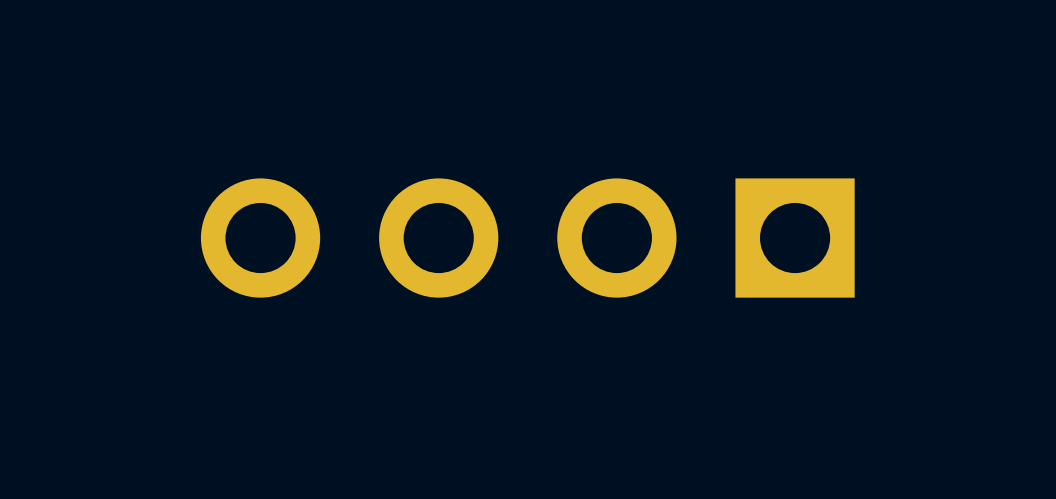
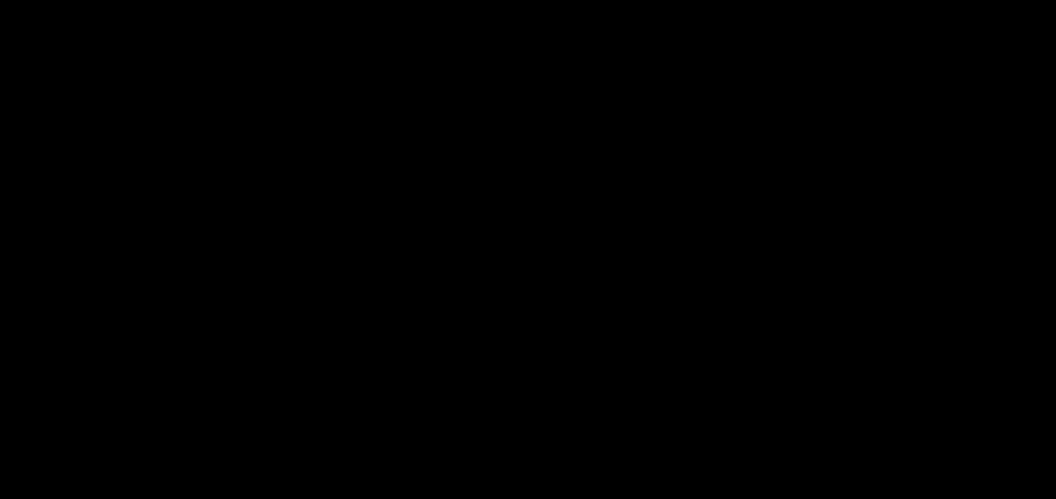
part: (527, 238) -> none

